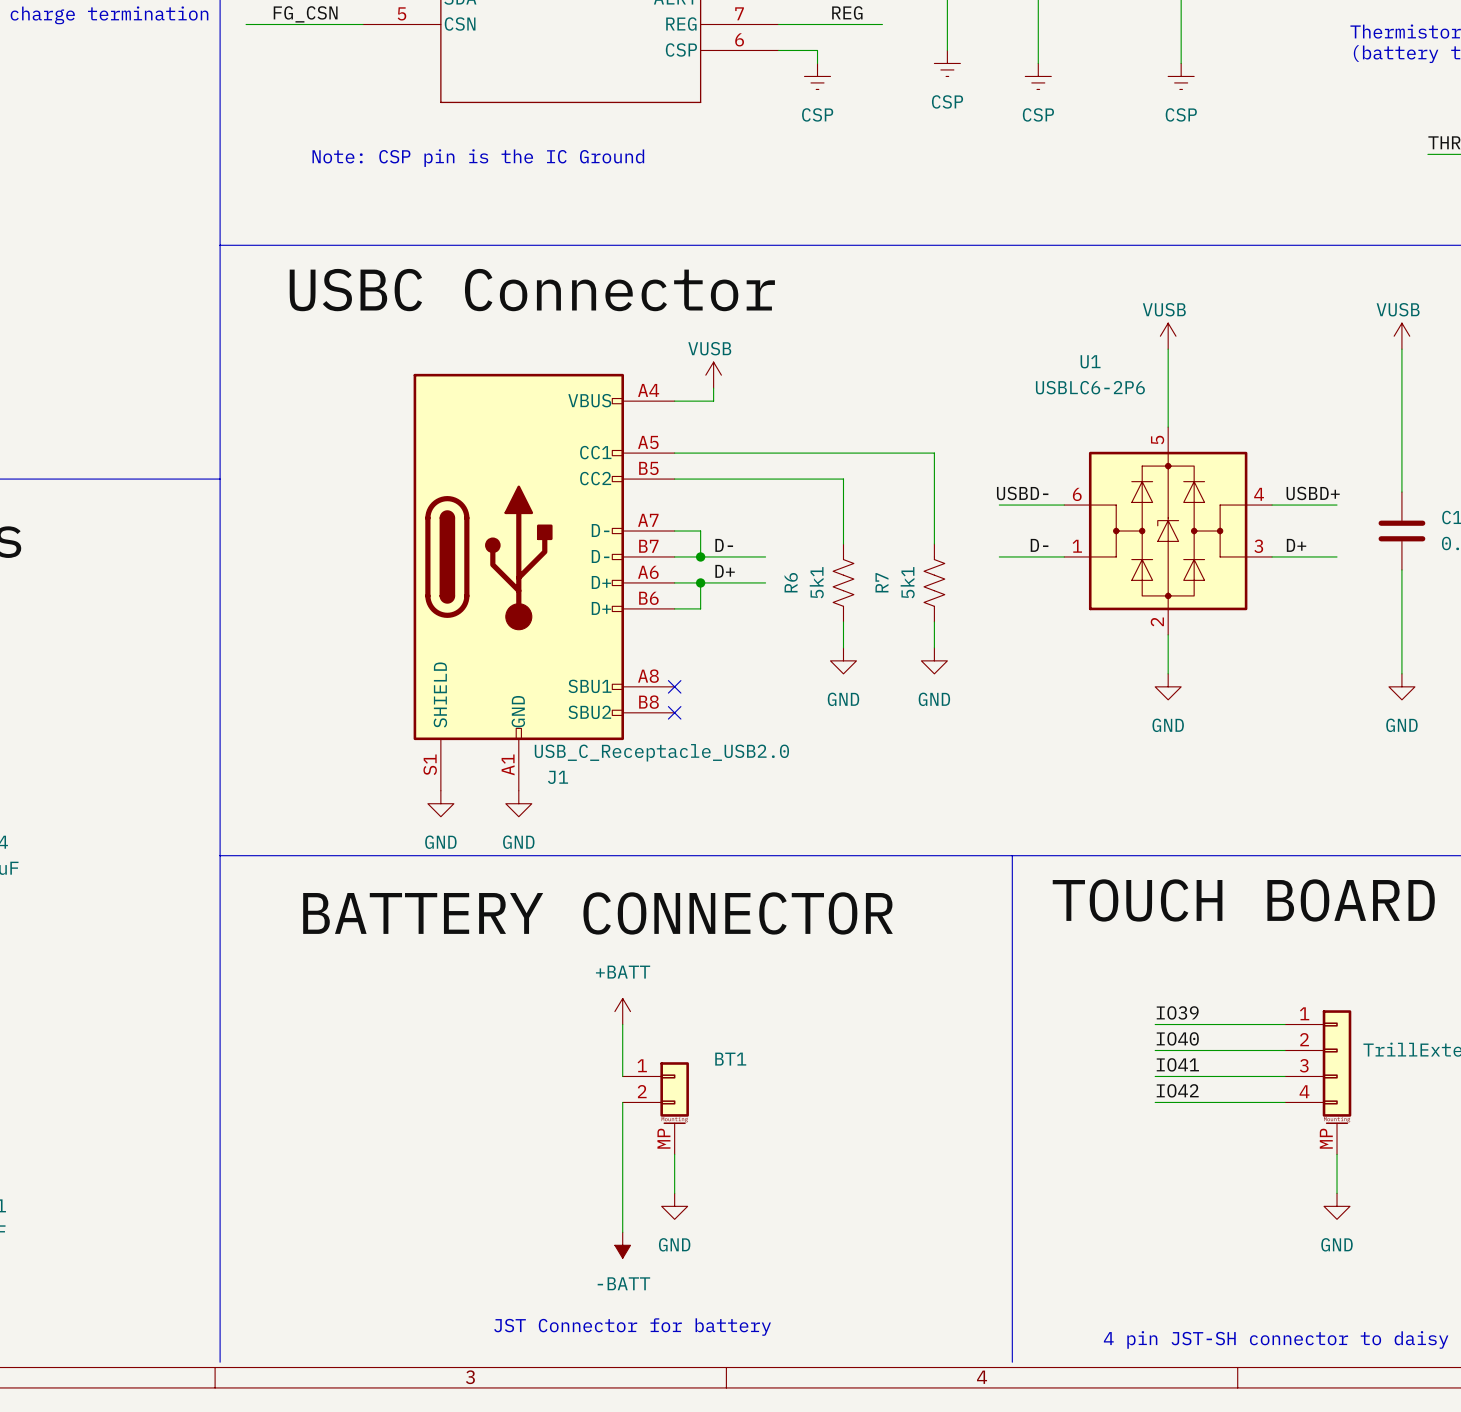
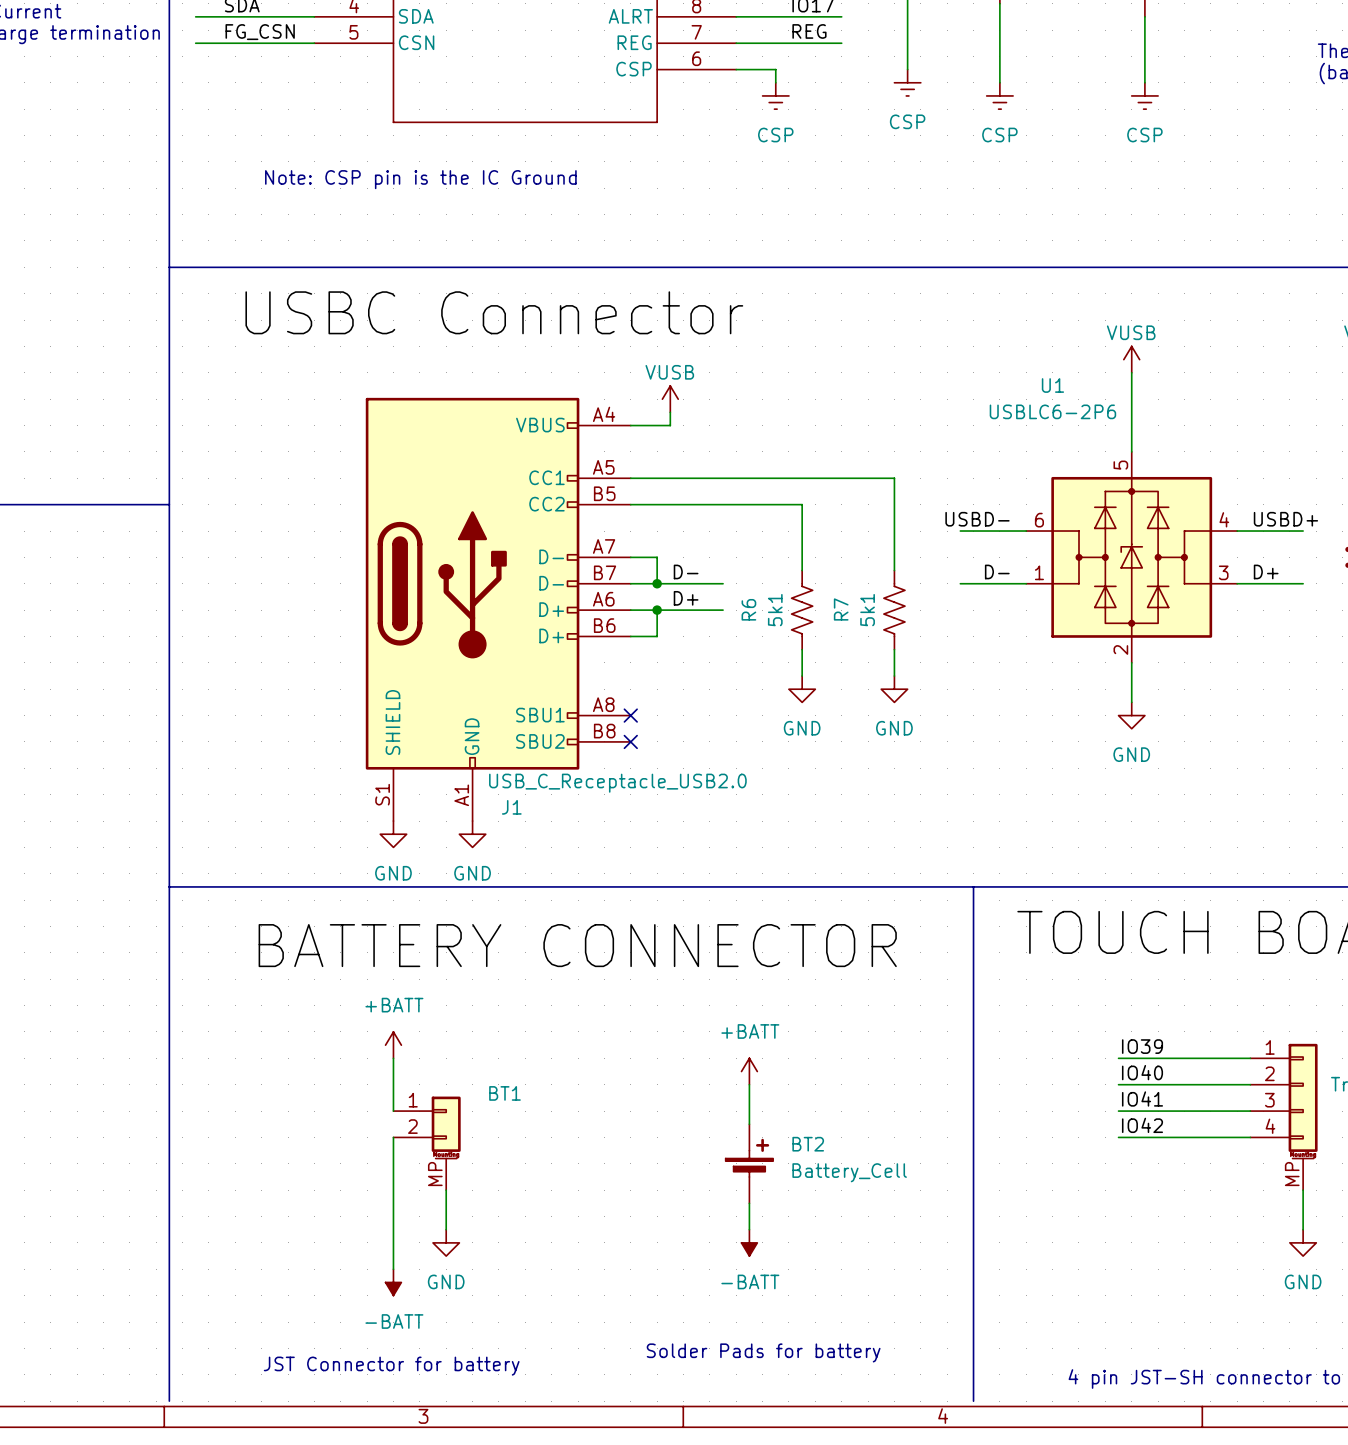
power symbol: none -> +BATT (393, 1045)
power symbol: +BATT (622, 1011) -> none
wire: (622, 1024) (622, 1076) -> (393, 1058) (393, 1111)
power symbol: none -> +BATT (749, 1071)
wire: none -> (749, 1084) (749, 1124)
wire: (622, 1102) (622, 1232) -> (393, 1137) (393, 1269)
BT1 position: (655, 1108) -> (427, 1143)
BT2: none -> Battery_Cell (749, 1163)
wire: (674, 1154) (674, 1193) -> (446, 1190) (446, 1229)
wire: none -> (749, 1203) (749, 1229)
power symbol position: GND (674, 1206) -> GND (446, 1242)
power symbol: none -> -BATT (749, 1242)
power symbol: none -> -BATT (393, 1282)
power symbol: -BATT (622, 1245) -> none
text: none -> Solder Pads for battery (763, 1352)
text position: JST Connector for battery (632, 1327) -> JST Connector for battery (391, 1366)

